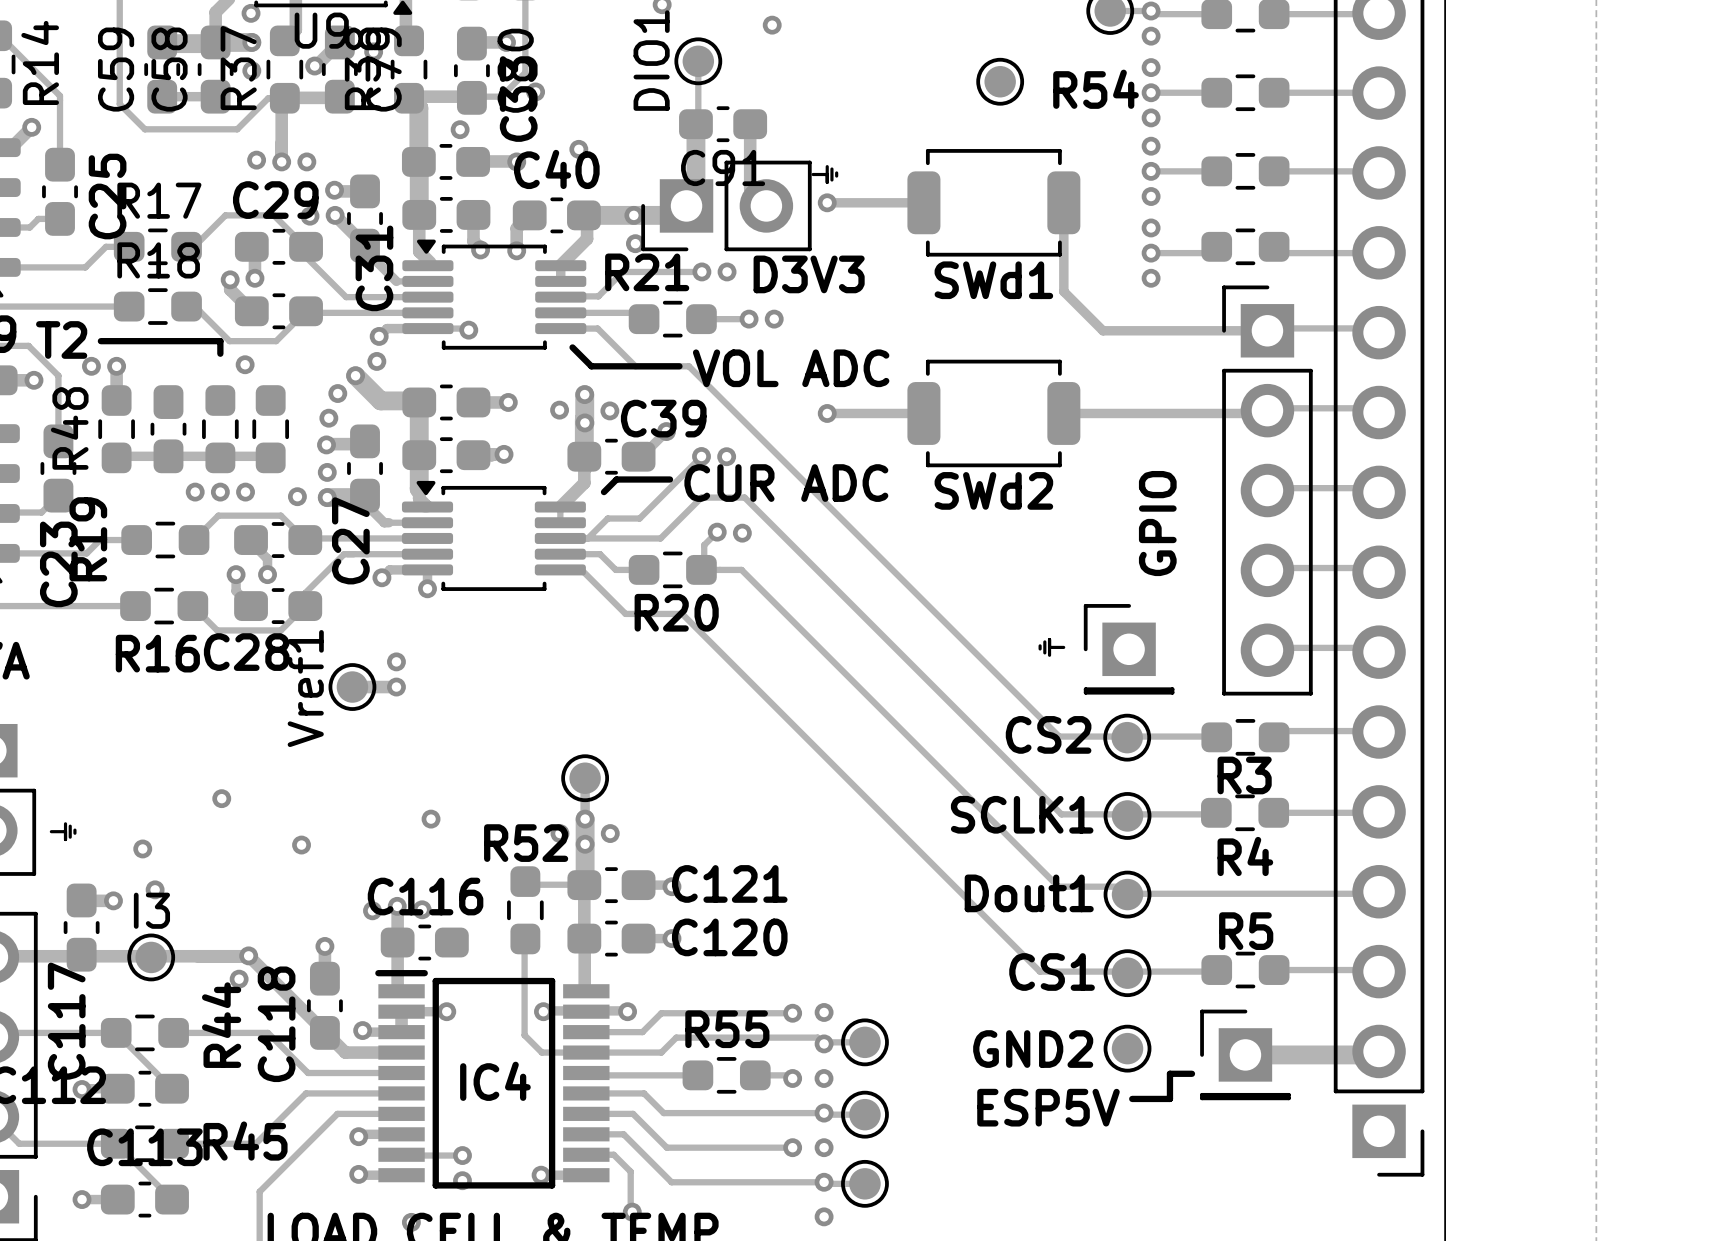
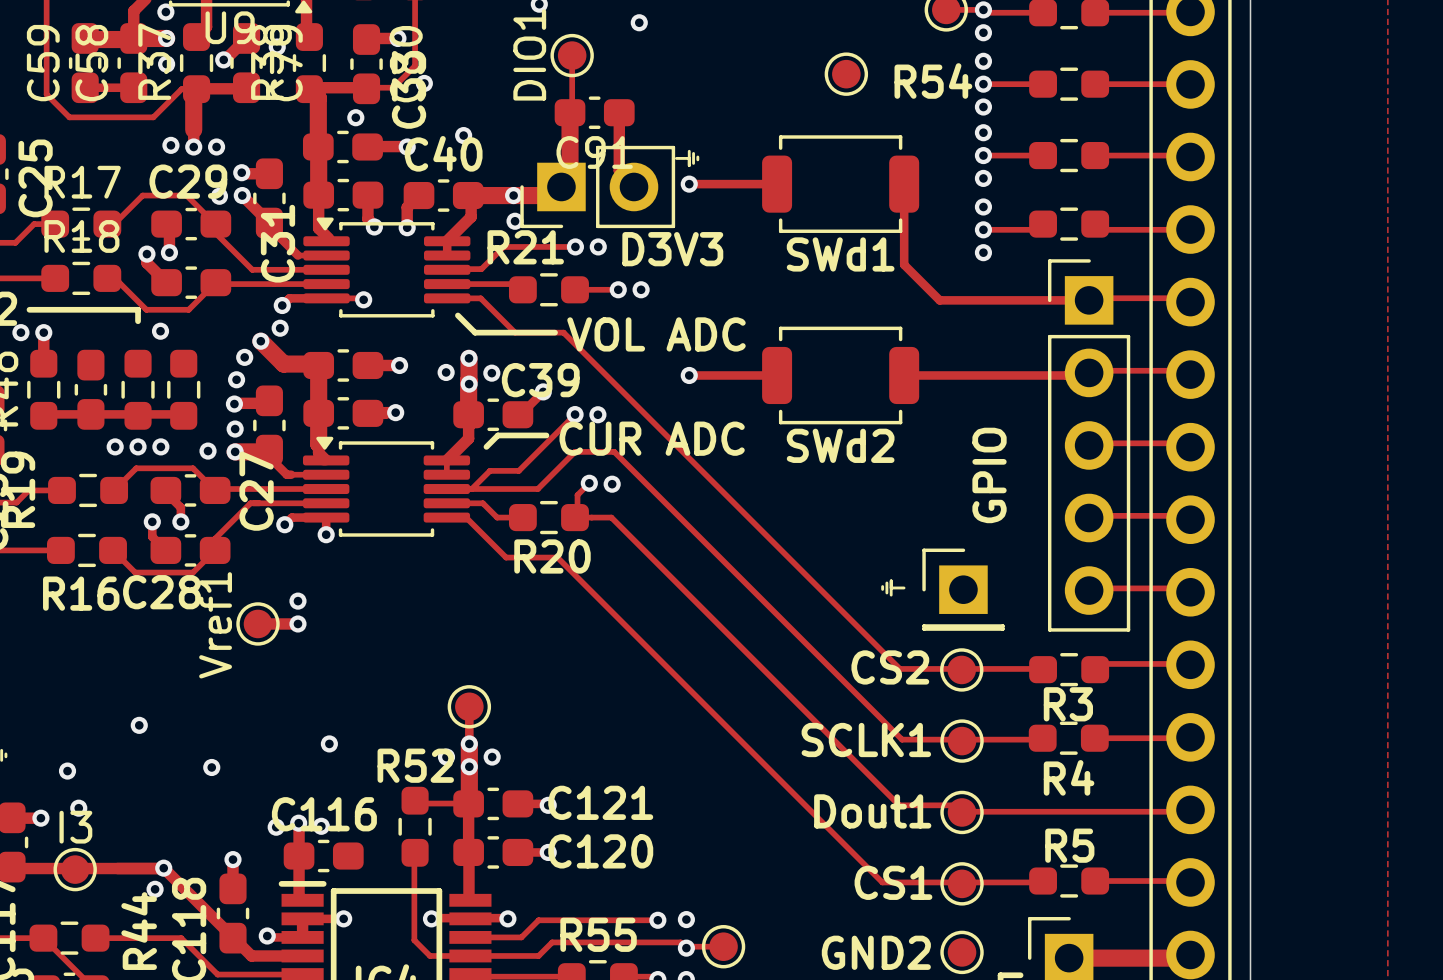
track width: thin (281, 101) (281, 143) -> thick (193, 92) (193, 129)

